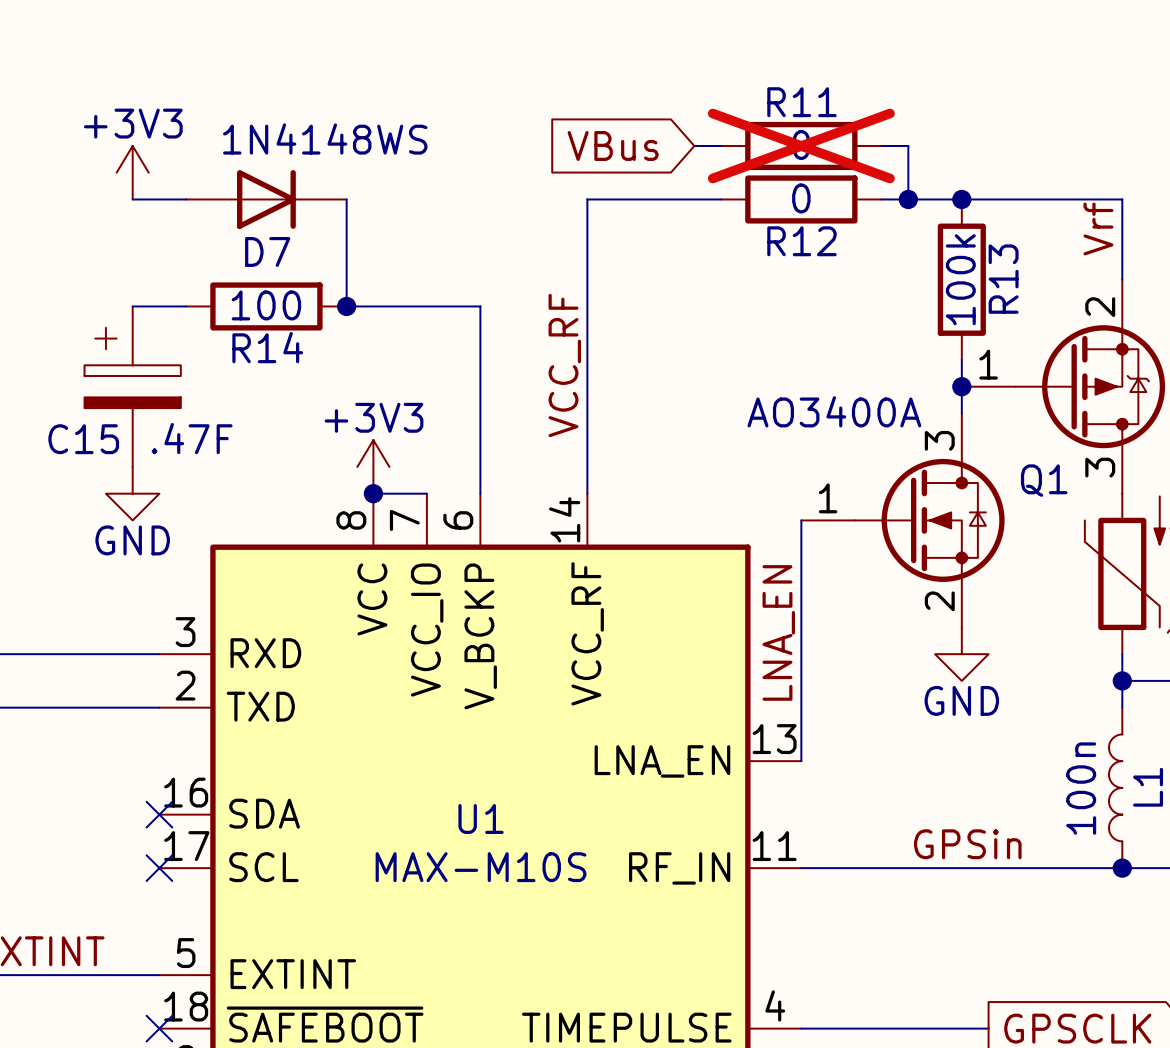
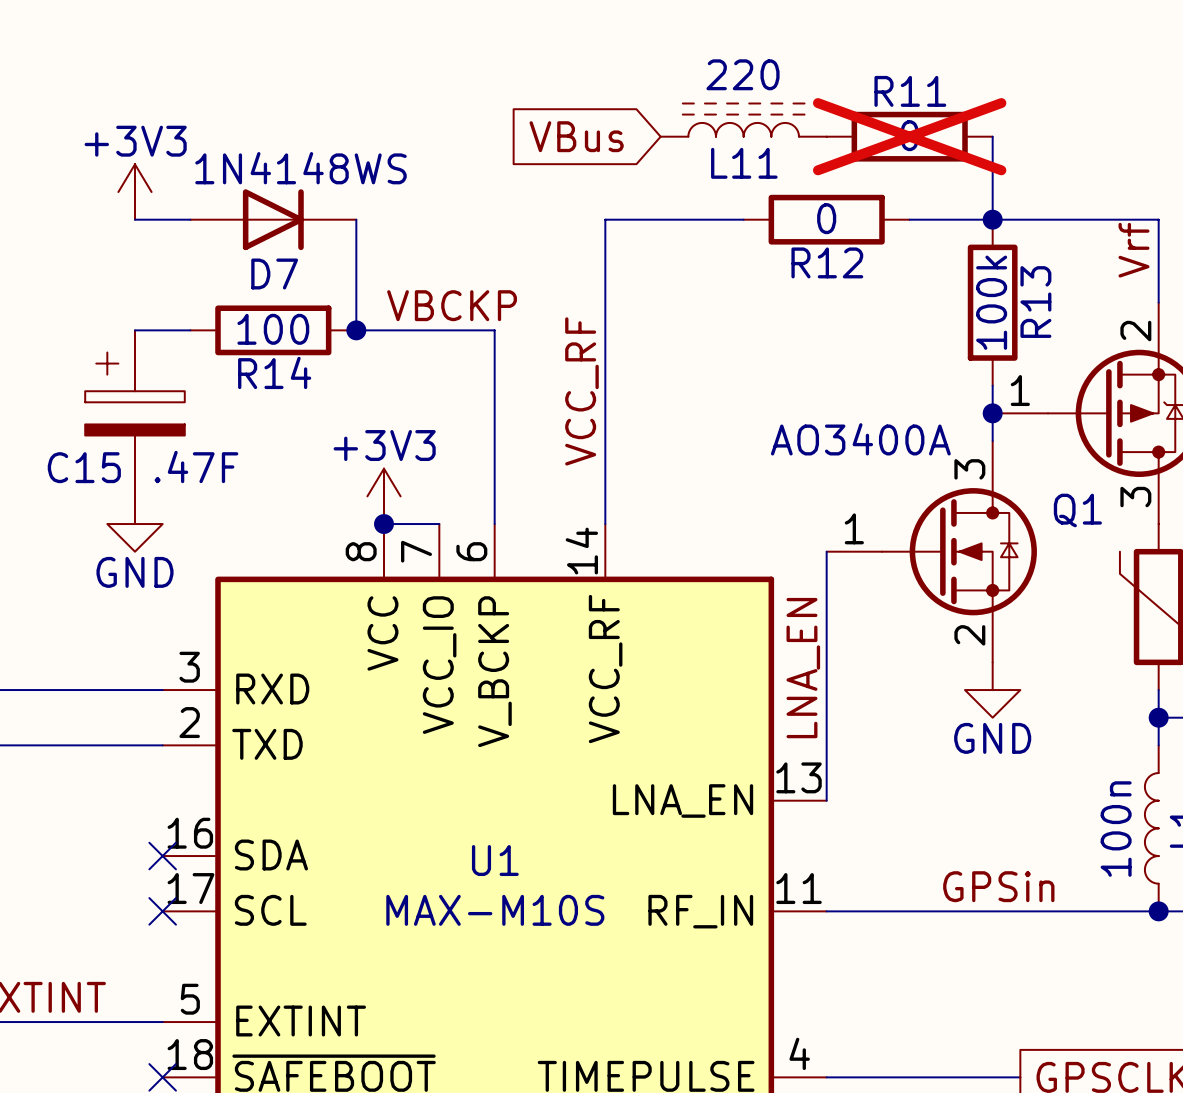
L11: none -> 220 (743, 120)
wire: none -> (992, 136) (992, 219)
D7 value position: 1N4148WS (325, 139) -> 1N4148WS (300, 168)
global label position: VBus (613, 145) -> VBus (576, 136)
wire: (694, 145) (721, 145) -> none
R11 position: (801, 145) -> (909, 136)
wire: (881, 145) (908, 145) (908, 199) -> none
junction: (908, 199) -> none
label: none -> VBCKP (452, 305)

